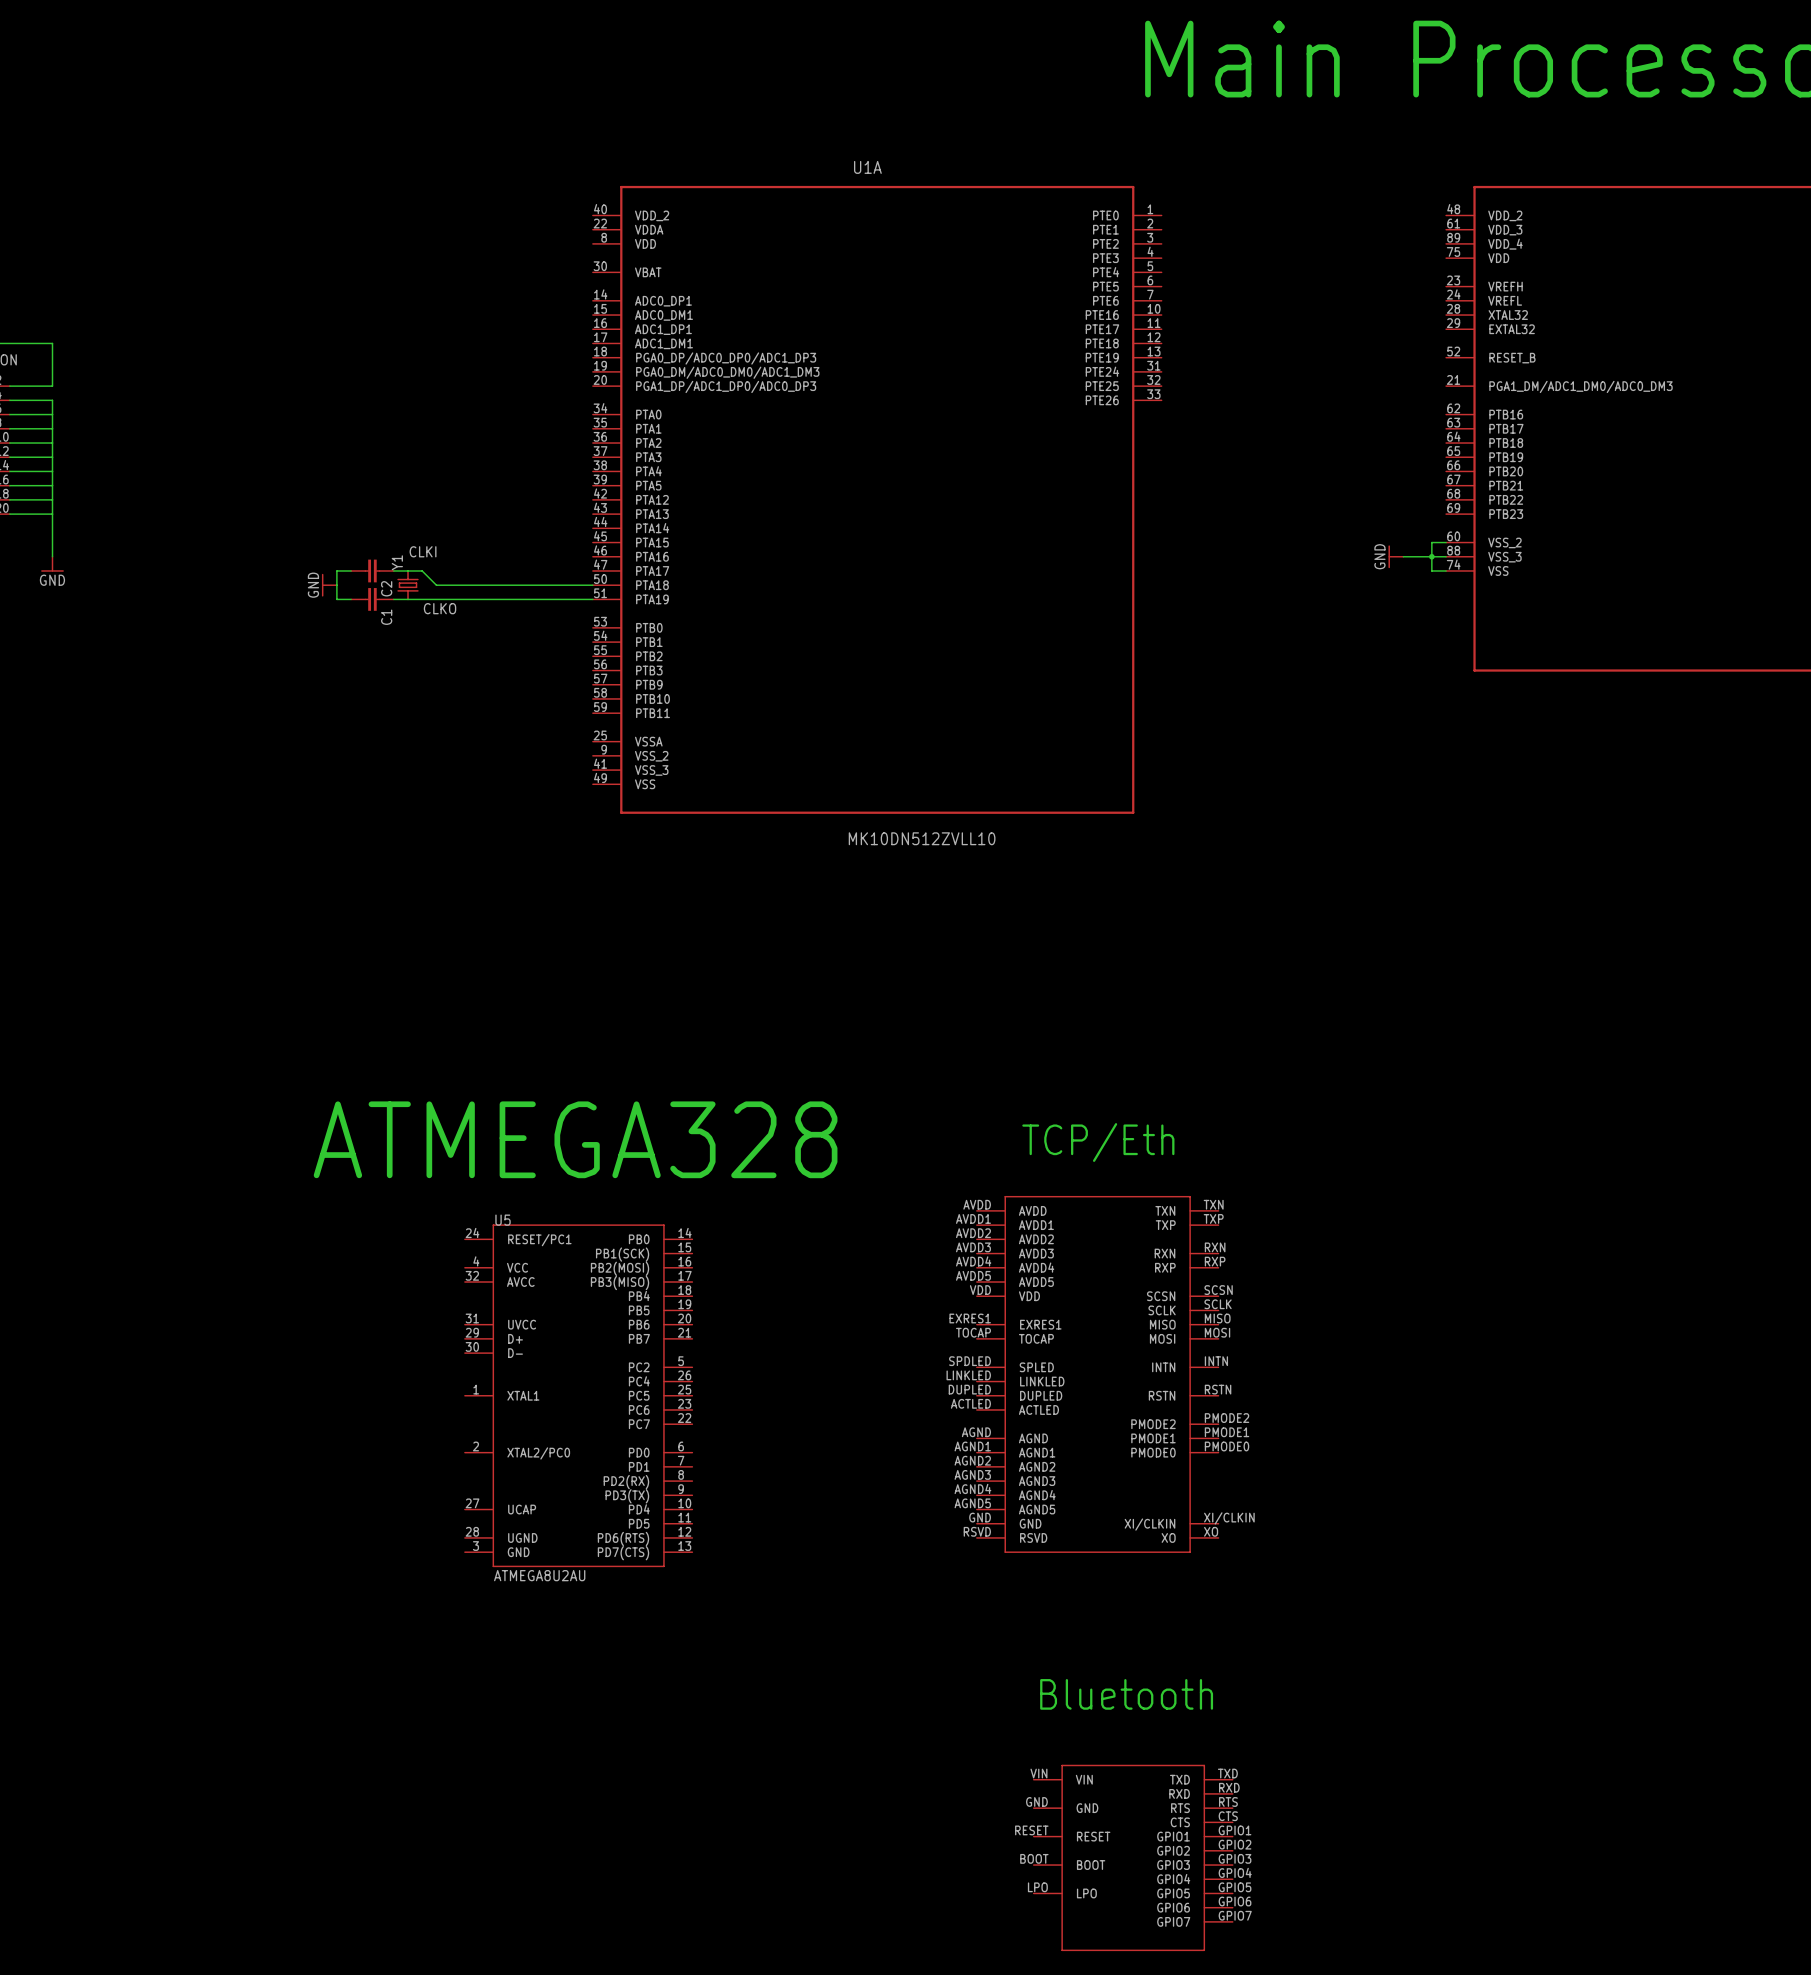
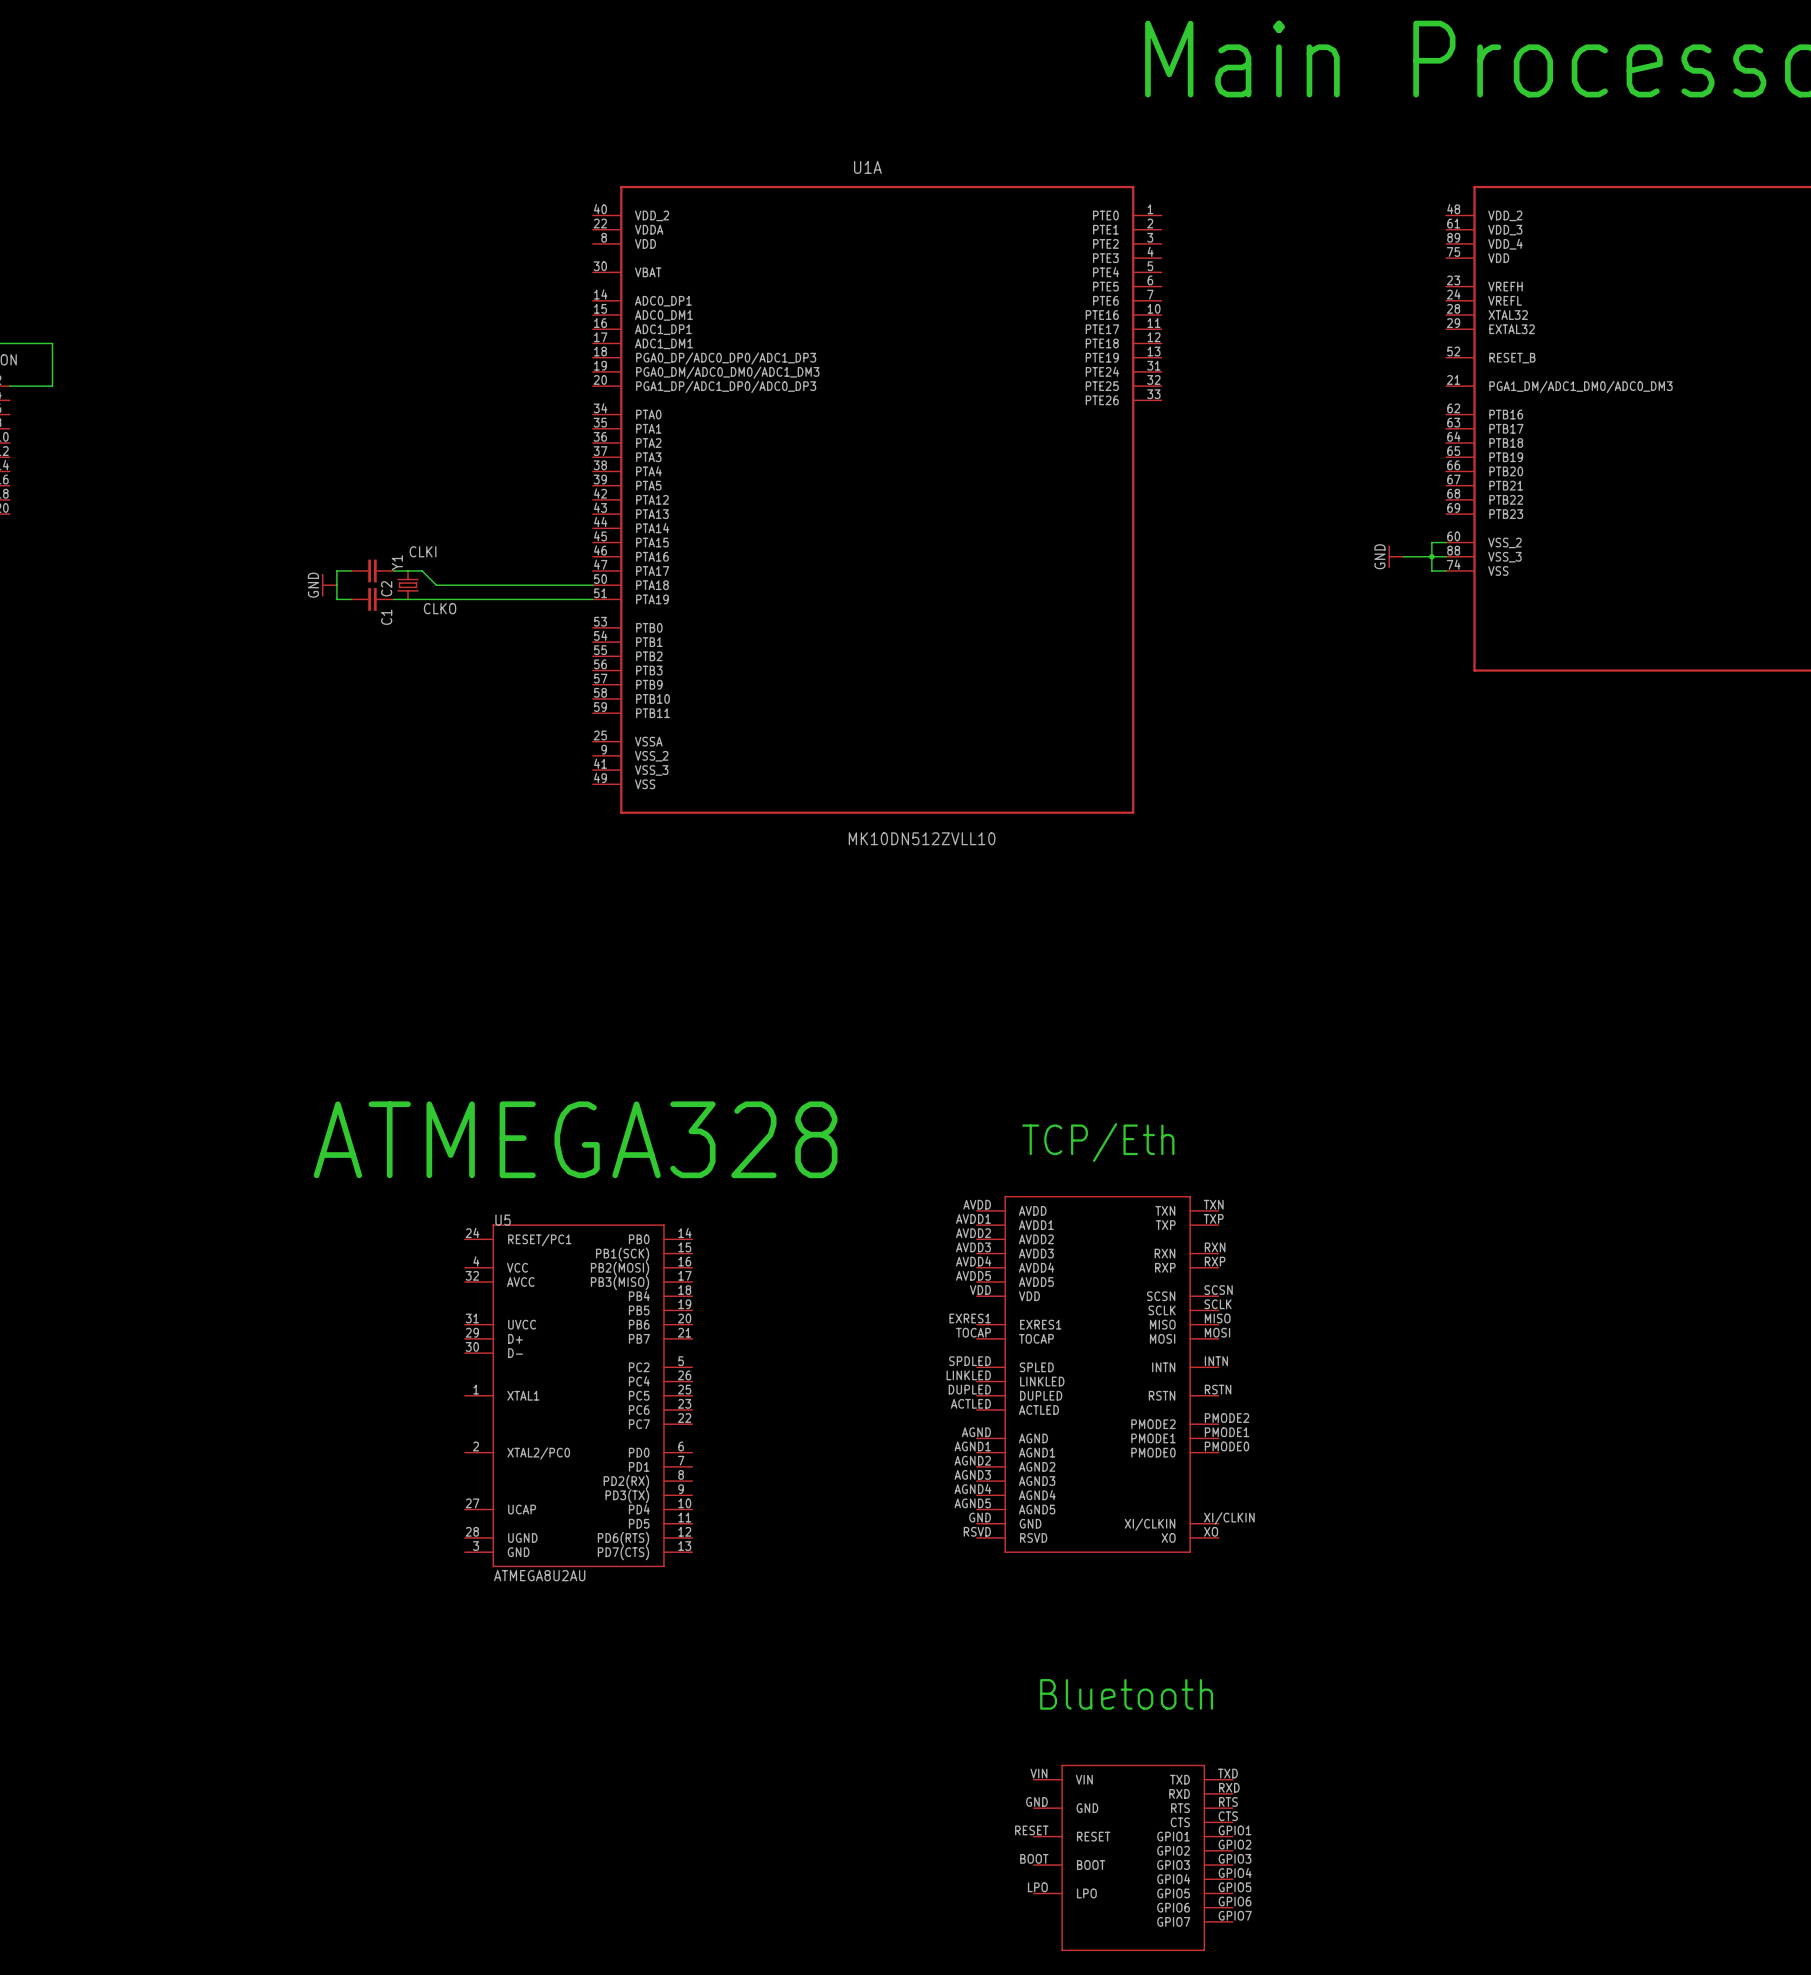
wire: (9, 400) (52, 400) (52, 556) -> none
wire: (9, 414) (52, 414) -> none
wire: (9, 428) (52, 428) -> none
wire: (9, 443) (52, 443) -> none
wire: (9, 457) (52, 457) -> none
wire: (9, 471) (52, 471) -> none
wire: (9, 485) (52, 485) -> none
wire: (9, 499) (52, 499) -> none
wire: (9, 514) (52, 514) -> none
power symbol: GND (52, 564) -> none

